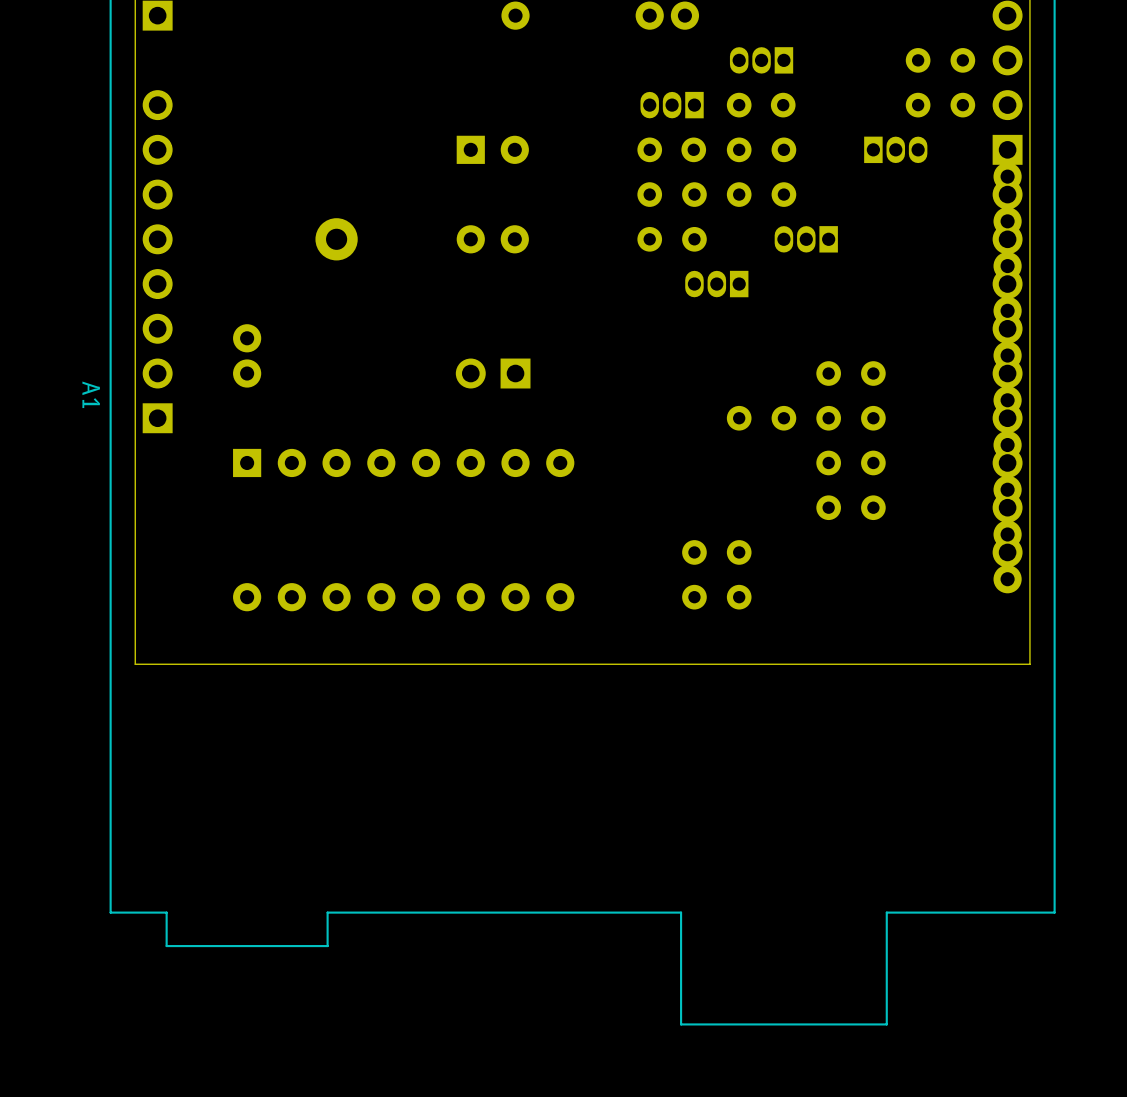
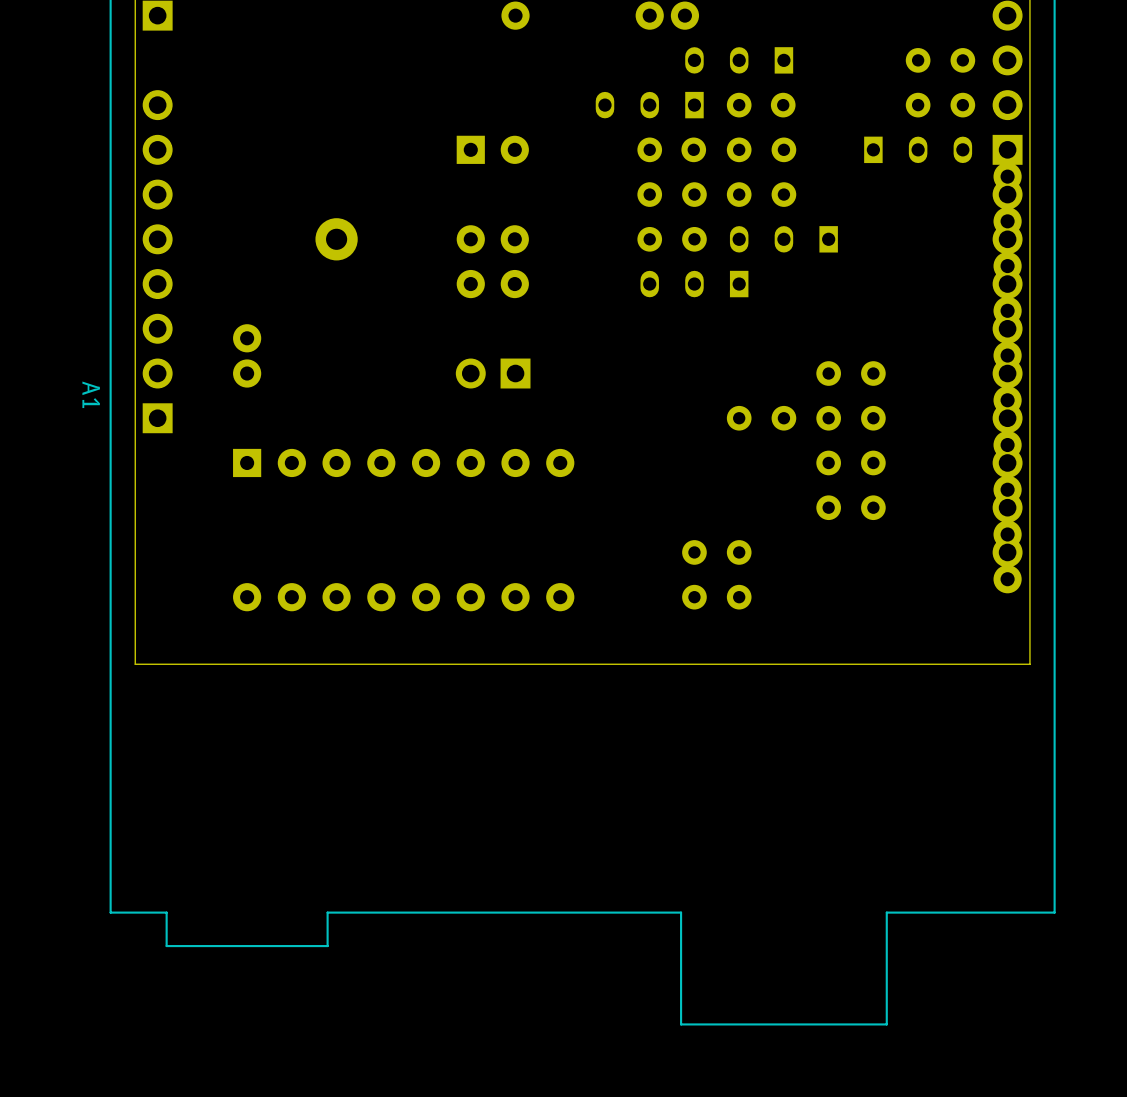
part: none -> (739, 60)
part: (761, 60) -> none
part: none -> (649, 105)
part: (672, 105) -> none
part: (895, 149) -> none
part: none -> (918, 149)
part: none -> (783, 239)
part: (806, 239) -> none
part: none -> (492, 284)
part: none -> (694, 284)
part: (716, 284) -> none

